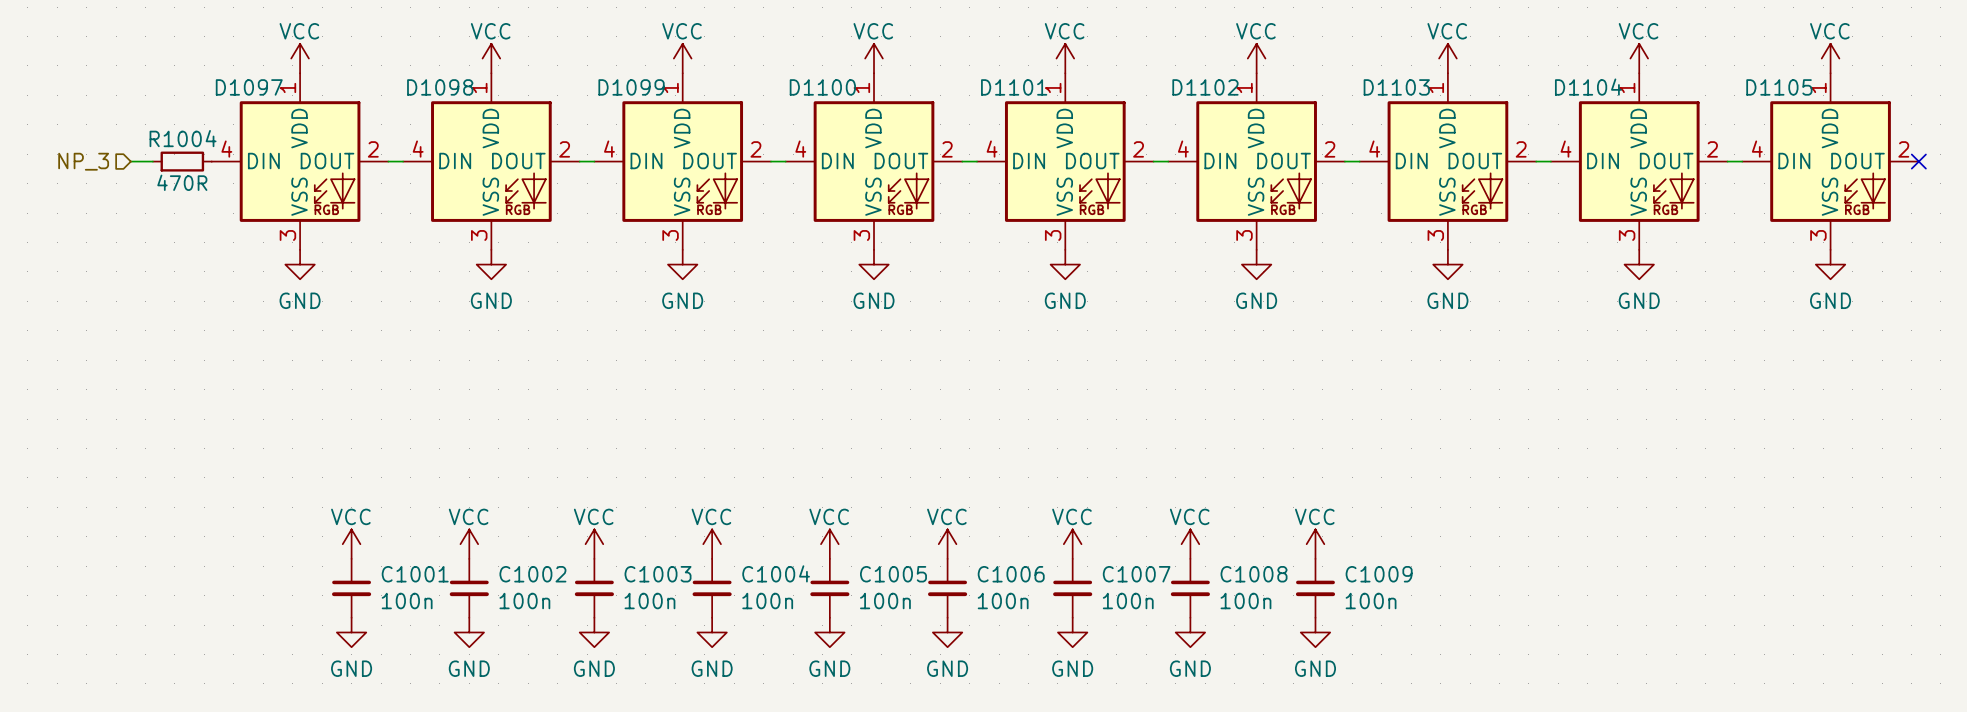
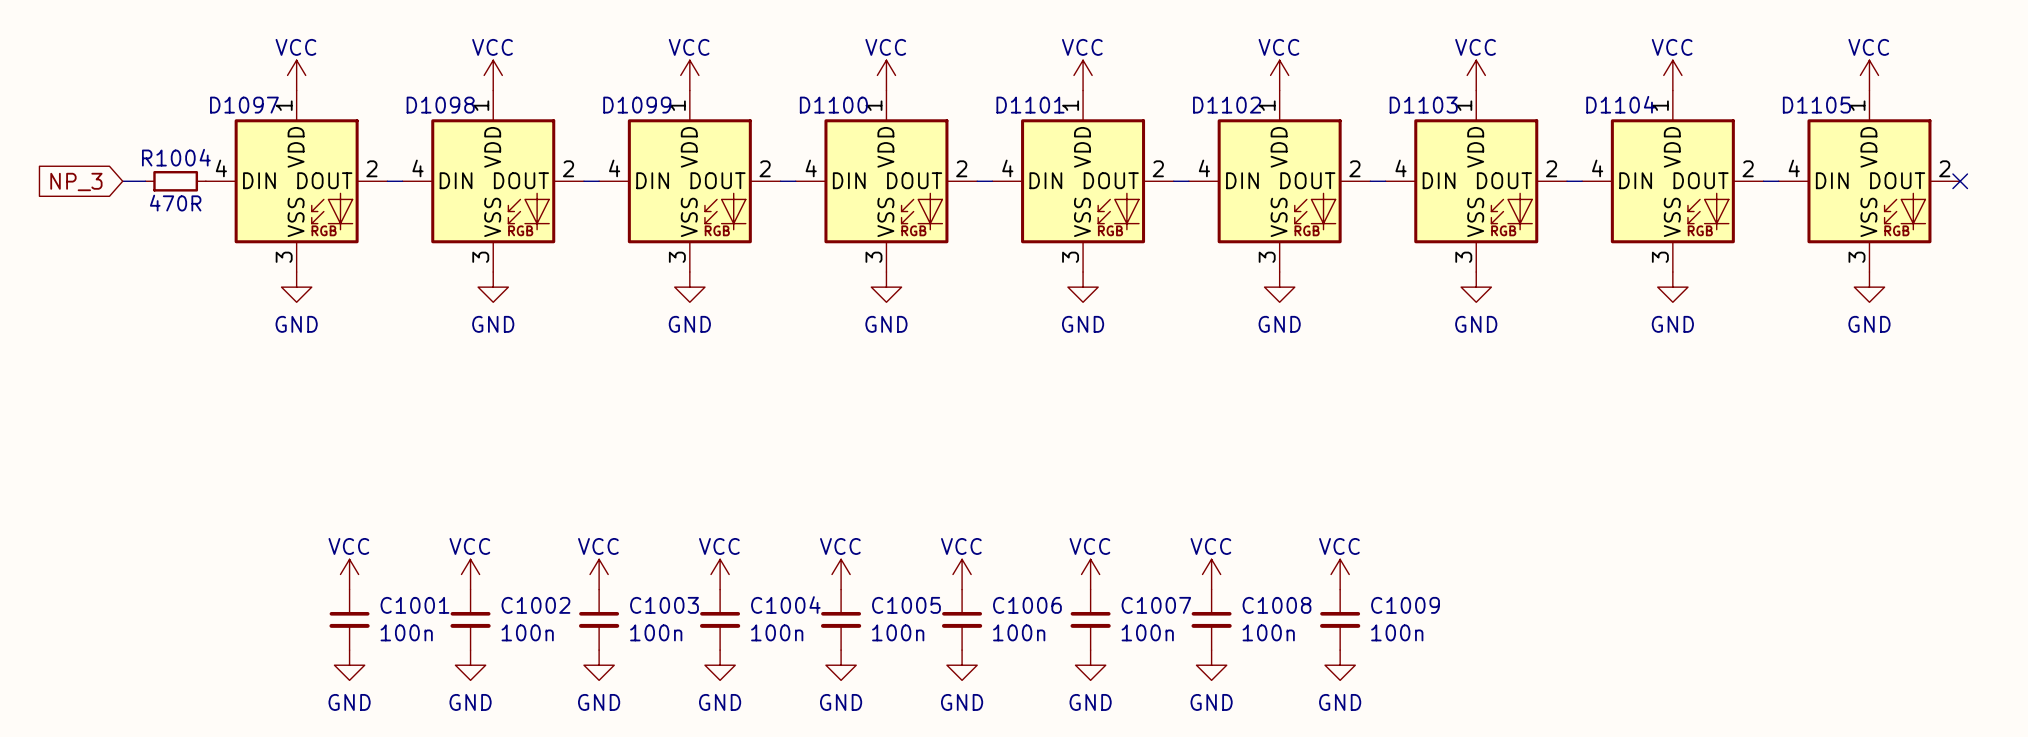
hierarchical label: NP_3 (83, 161) -> none
global label: none -> NP_3 (76, 181)

